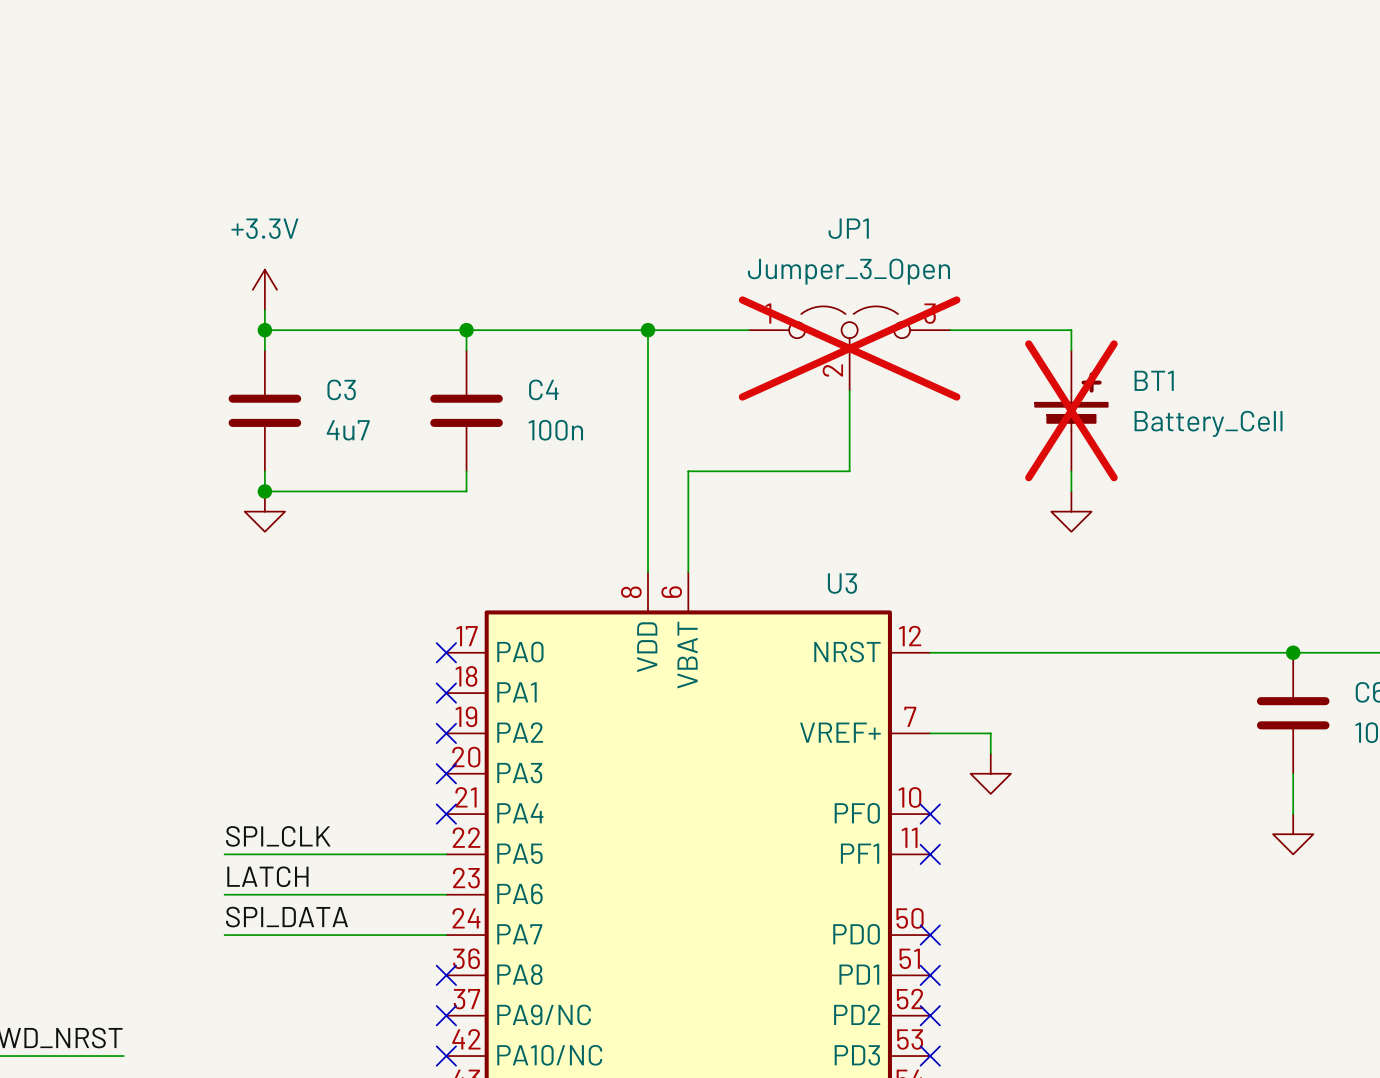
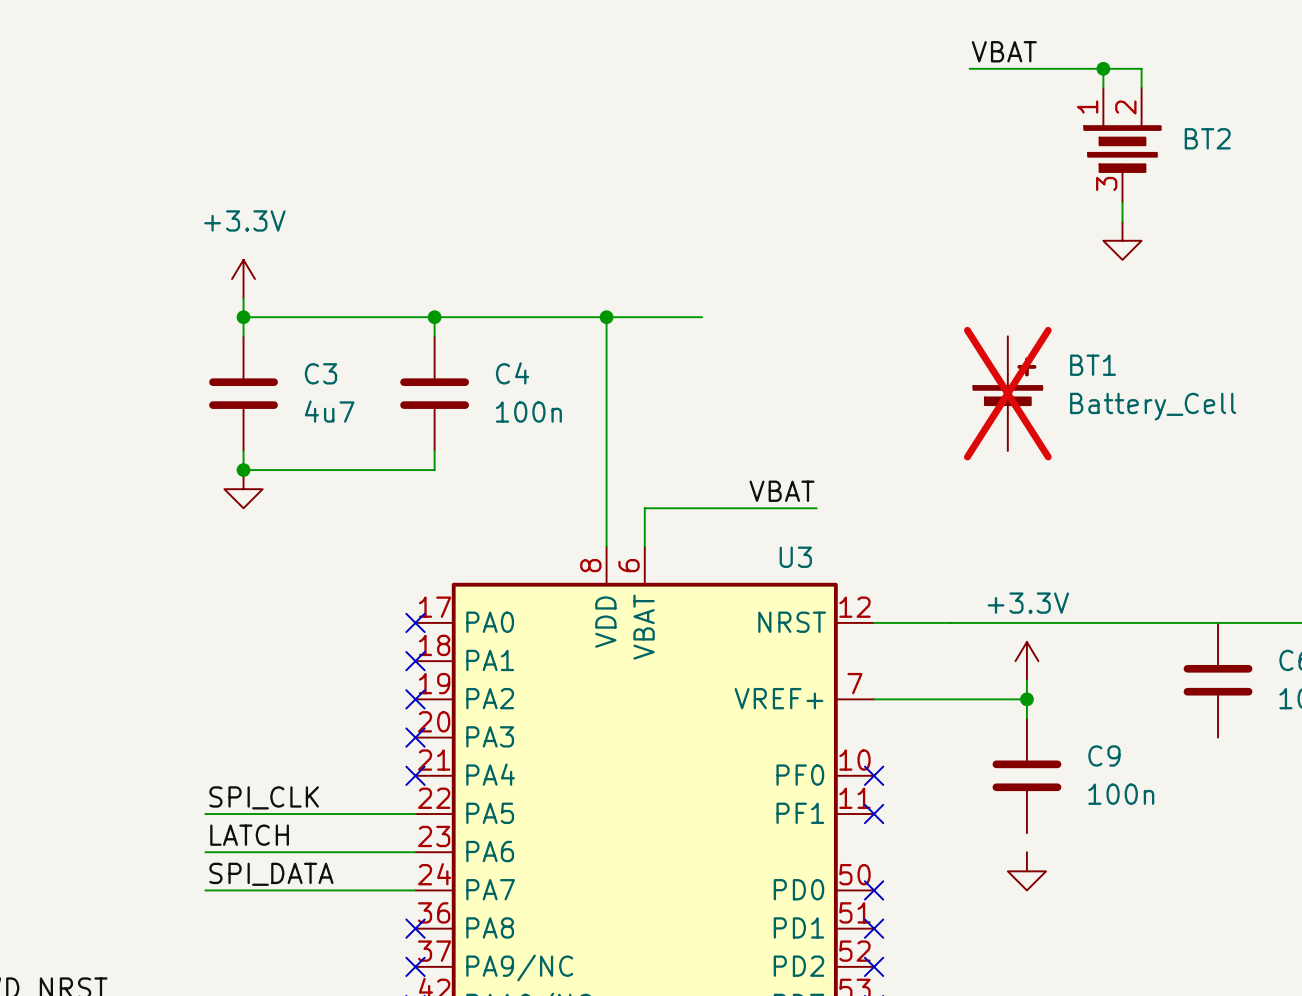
label: none -> VBAT (1004, 51)
wire: none -> (969, 68) (1141, 68) (1141, 87)
wire: none -> (1103, 68) (1103, 87)
junction: none -> (1103, 68)
BT2: none -> (1122, 145)
power symbol: none -> (1122, 240)
wire: (950, 330) (1071, 330) (1071, 350) -> none
JP1: Jumper_3_Open (849, 348) -> none
wire: (849, 390) (849, 471) (688, 471) (688, 531) -> (816, 508) (644, 508)
wire: (1071, 471) (1071, 491) -> (1122, 202) (1122, 221)
power symbol: (1071, 511) -> none
label: none -> VBAT (782, 491)
junction: (1293, 652) -> none
power symbol: none -> +3.3V (1026, 661)
wire: (990, 733) (990, 753) -> (931, 699) (1026, 699)
junction: none -> (1026, 699)
power symbol: (990, 773) -> none
wire: (1293, 773) (1293, 814) -> (1026, 680) (1026, 718)
C9: none -> 100n (1026, 775)
power symbol: (1293, 834) -> none
power symbol: none -> (1026, 871)

